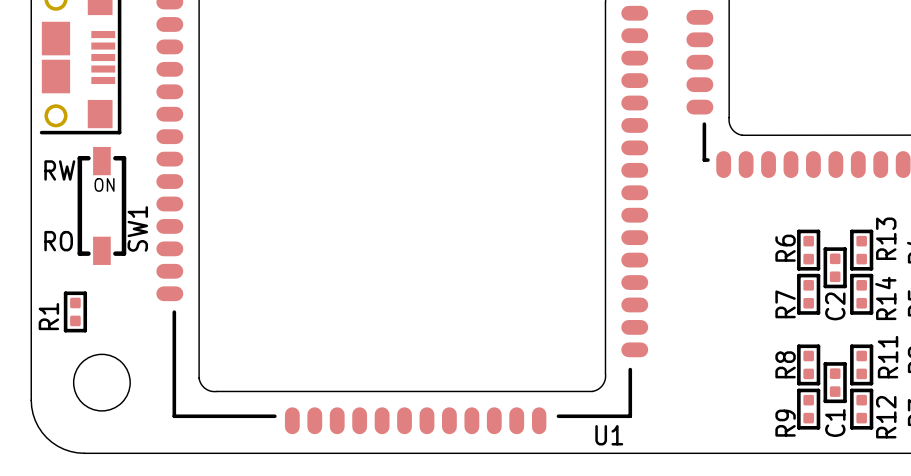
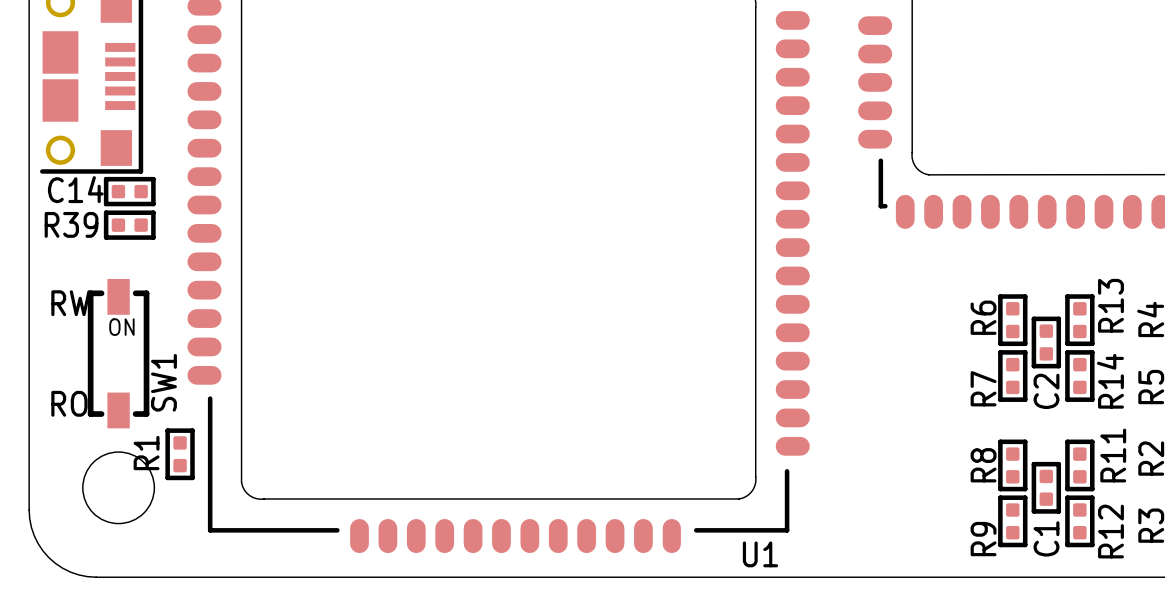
C14: none -> (129, 191)
text: RW (59, 170) -> none
R39: none -> (129, 225)
SW1 position: (101, 205) -> (118, 353)
text: RO (58, 241) -> RW (70, 303)
R1 position: (75, 311) -> (180, 454)
text: none -> RO (69, 403)

